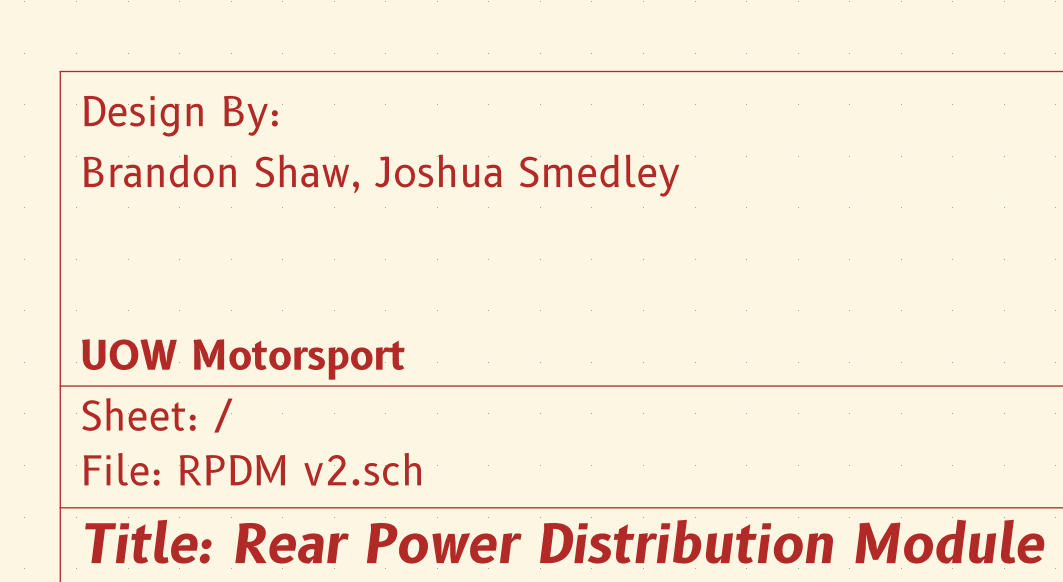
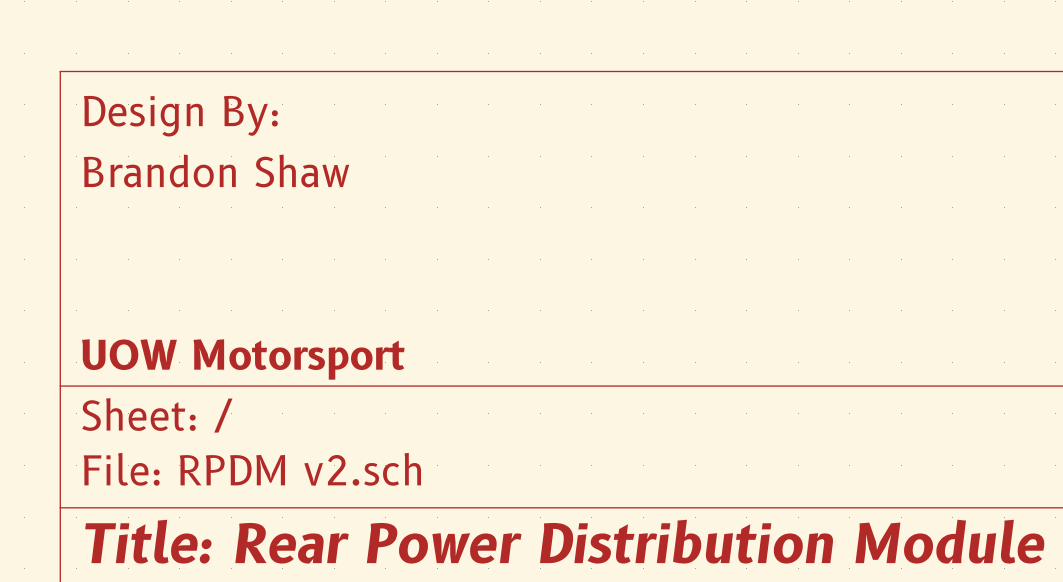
title block: Brandon Shaw, Joshua Smedley (381, 175) -> Brandon Shaw (216, 170)

